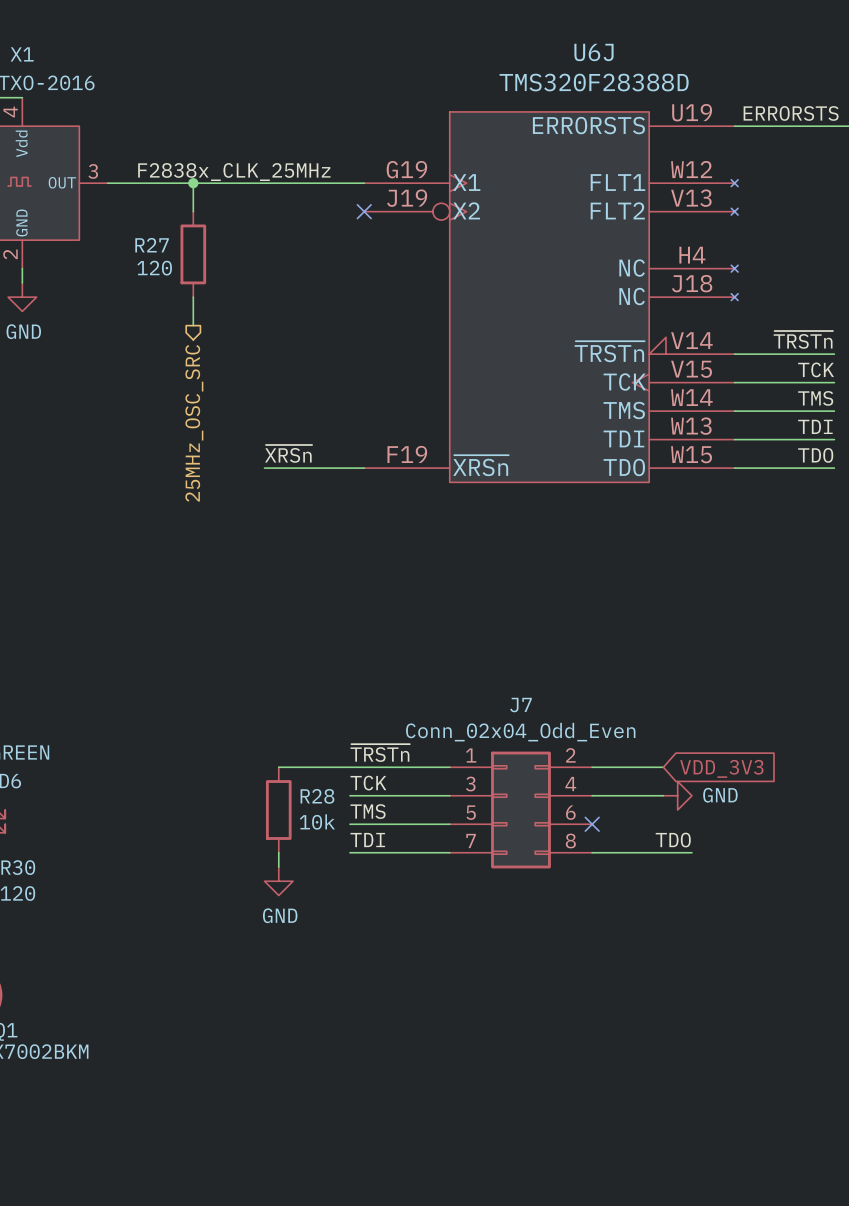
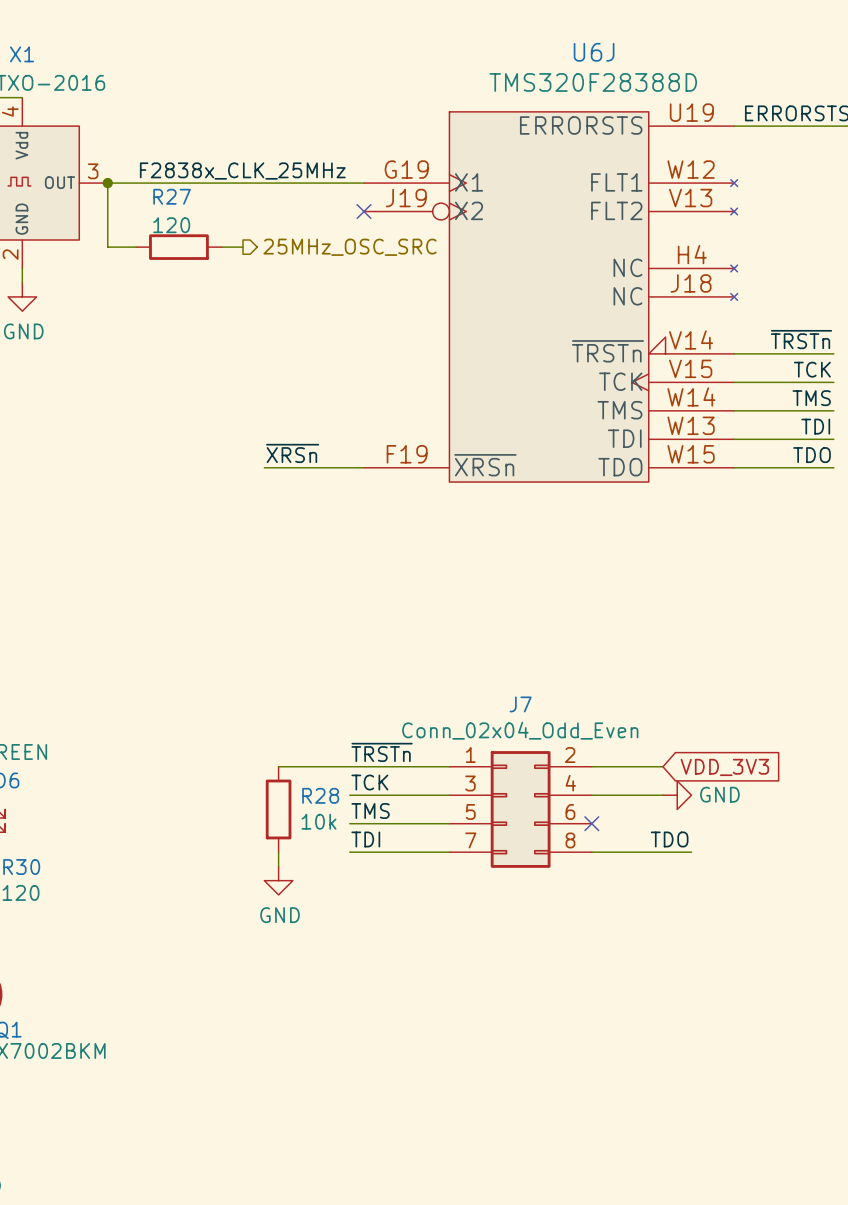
wire: none -> (107, 183) (107, 247) (136, 247)
junction: none -> (107, 183)
wire: (193, 183) (193, 211) -> none
junction: (193, 183) -> none
R27 name position: R27 (152, 245) -> R27 (172, 196)
wire: none -> (221, 247) (243, 247)
R27 rotation: 0° (193, 254) -> 90° clockwise (178, 247)
wire: (193, 297) (193, 325) -> none
hierarchical label rotation: 0° (194, 423) -> 90° counterclockwise (350, 247)
hierarchical label position: 25MHz_OSC_SRC (194, 423) -> 25MHz_OSC_SRC (350, 247)

